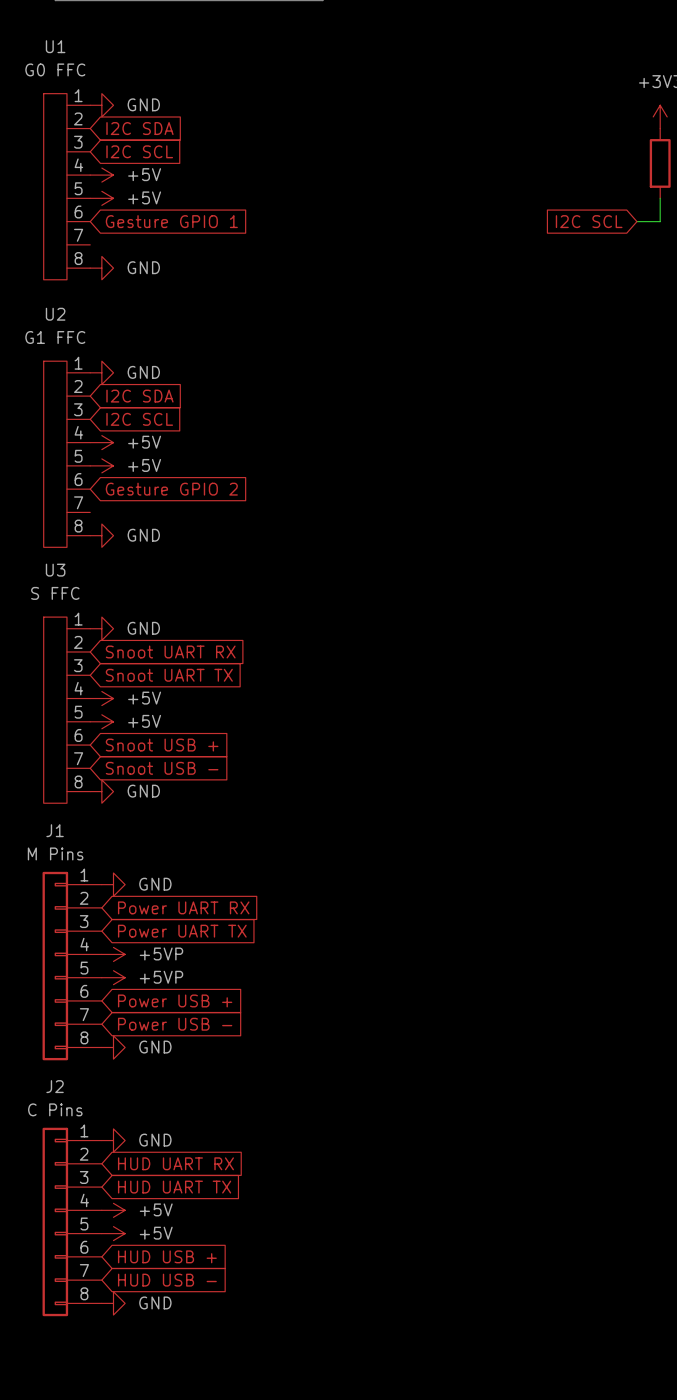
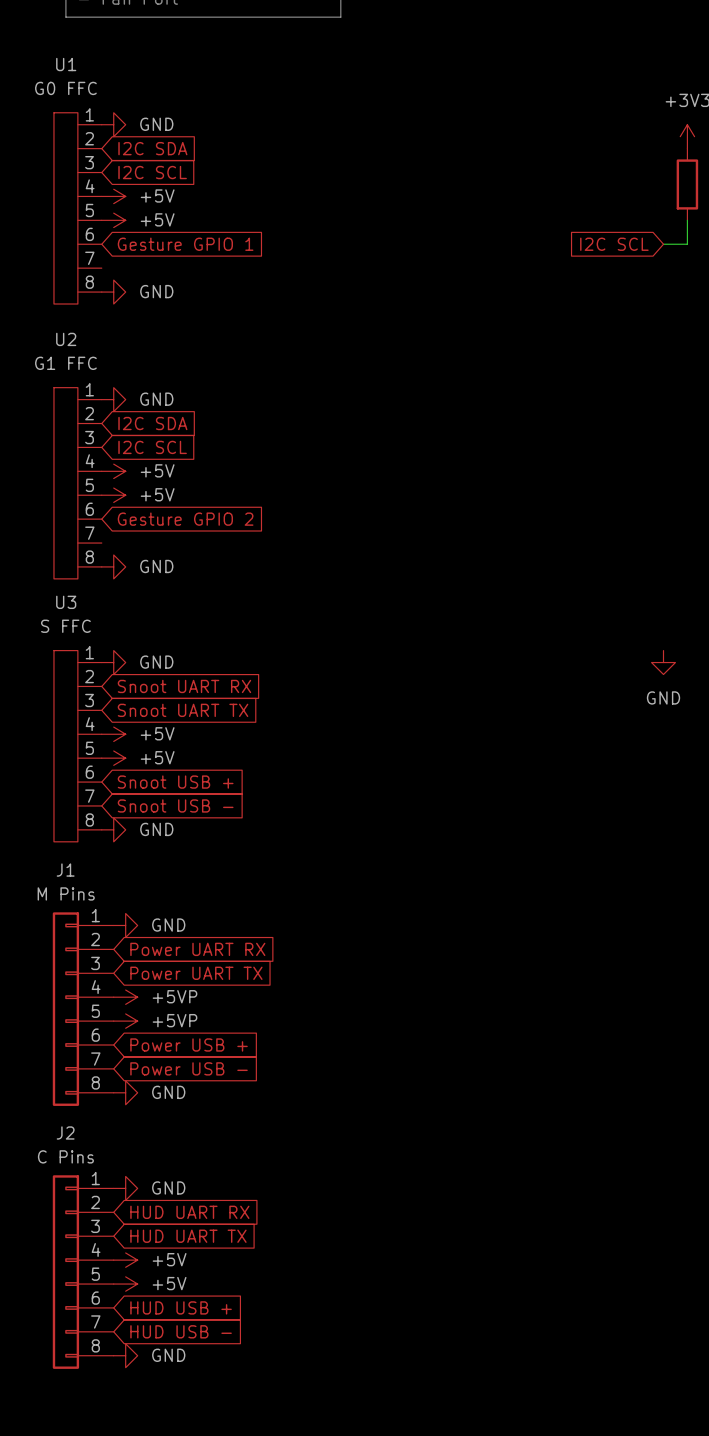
power symbol: none -> GND (663, 662)

